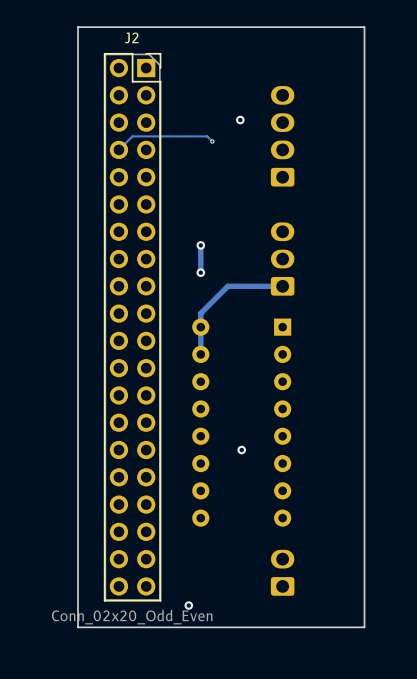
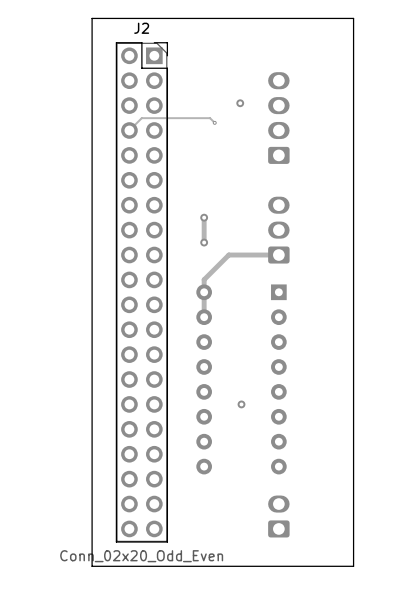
via: (188, 605) -> none

